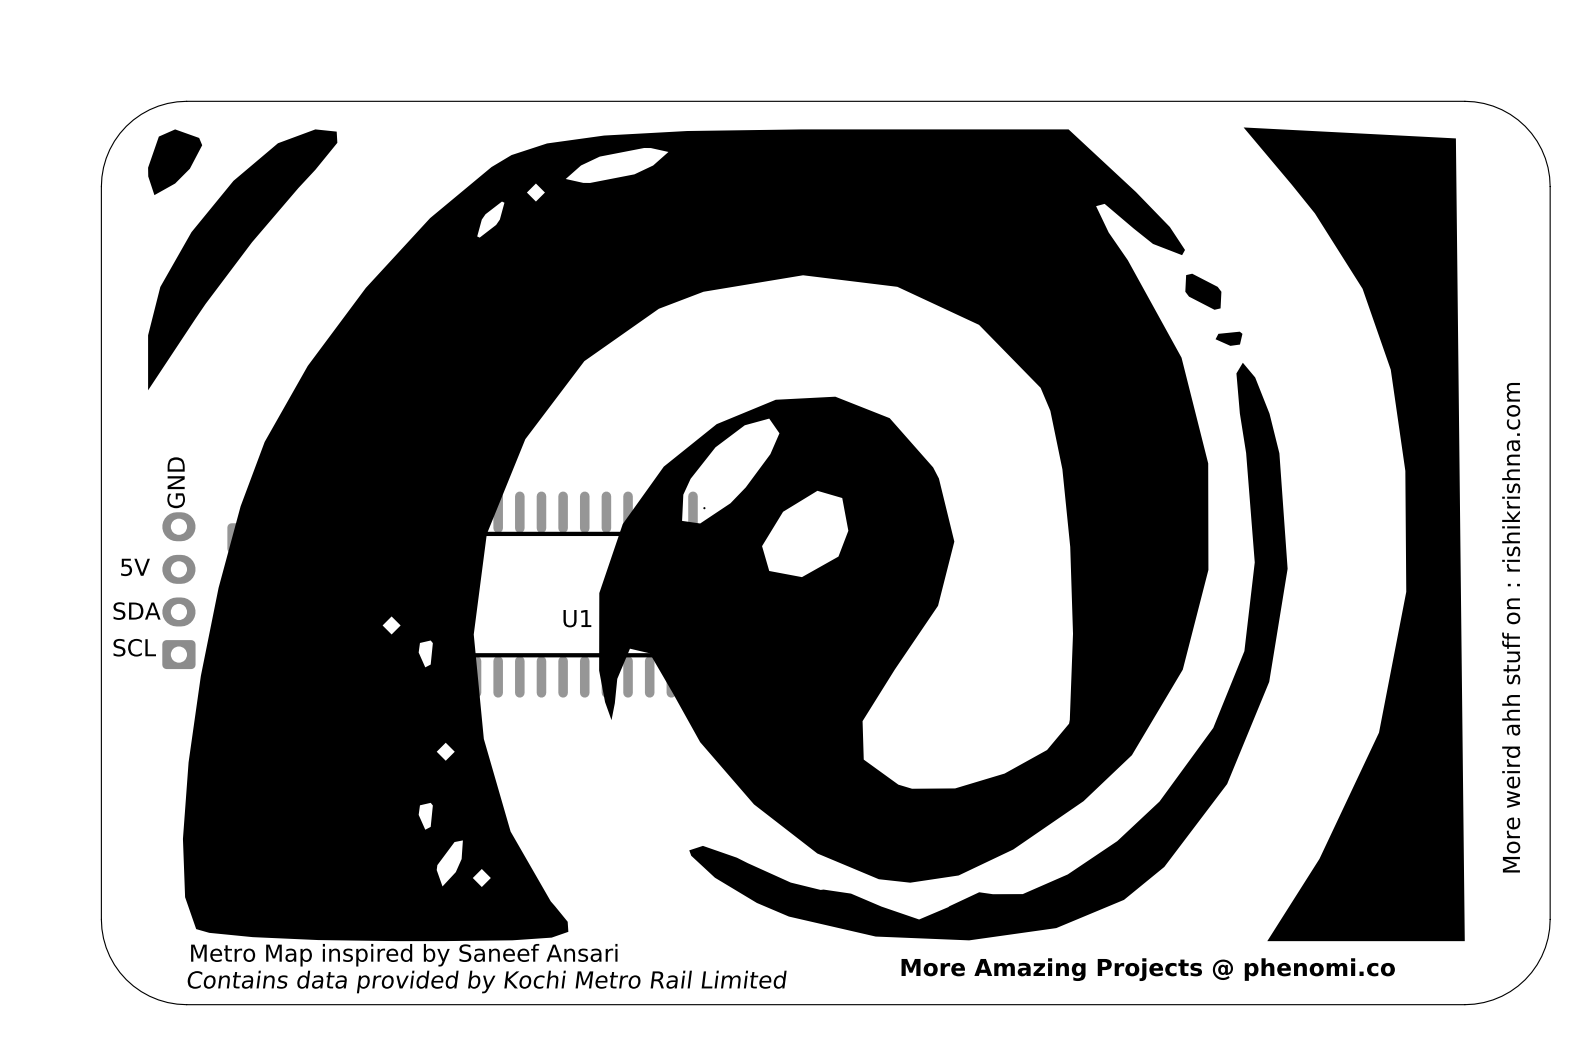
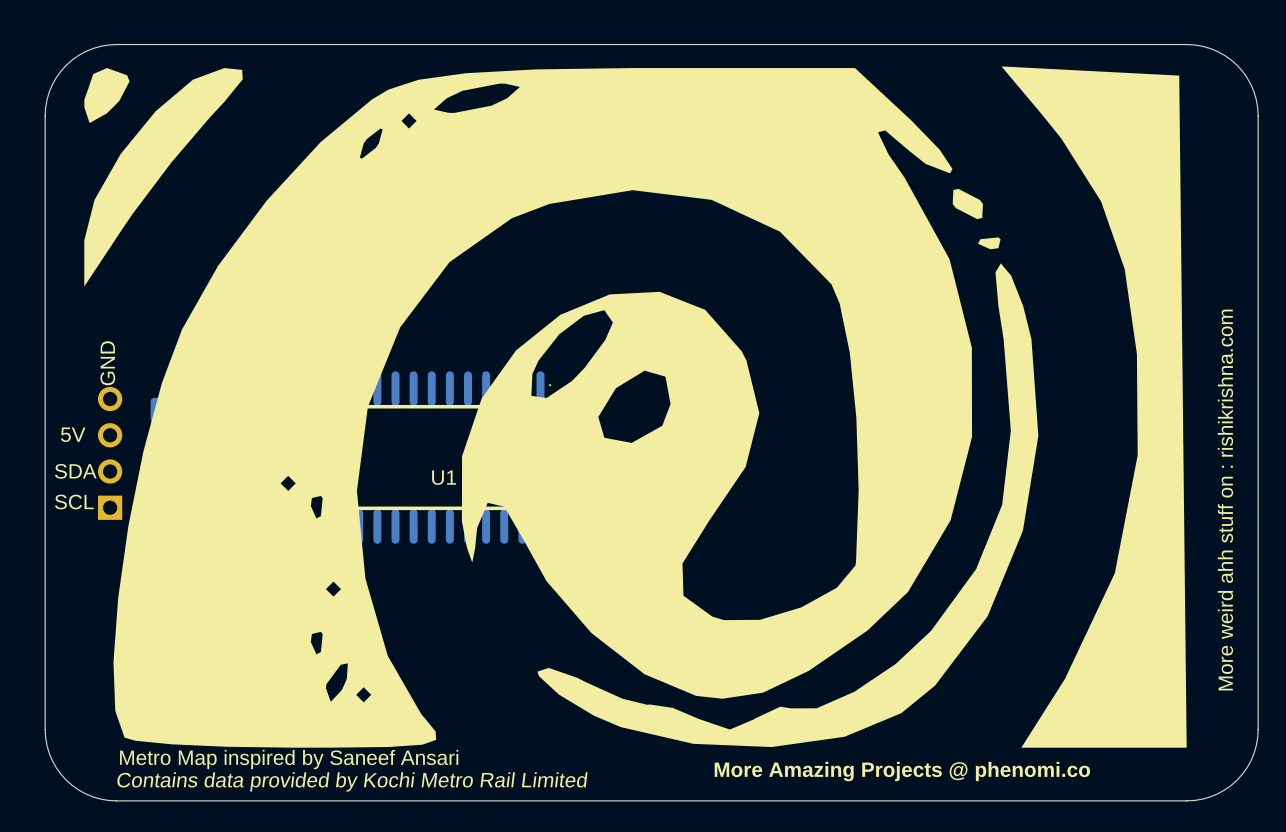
part footprint: [162, 512, 196, 670] -> [97, 386, 123, 520]

